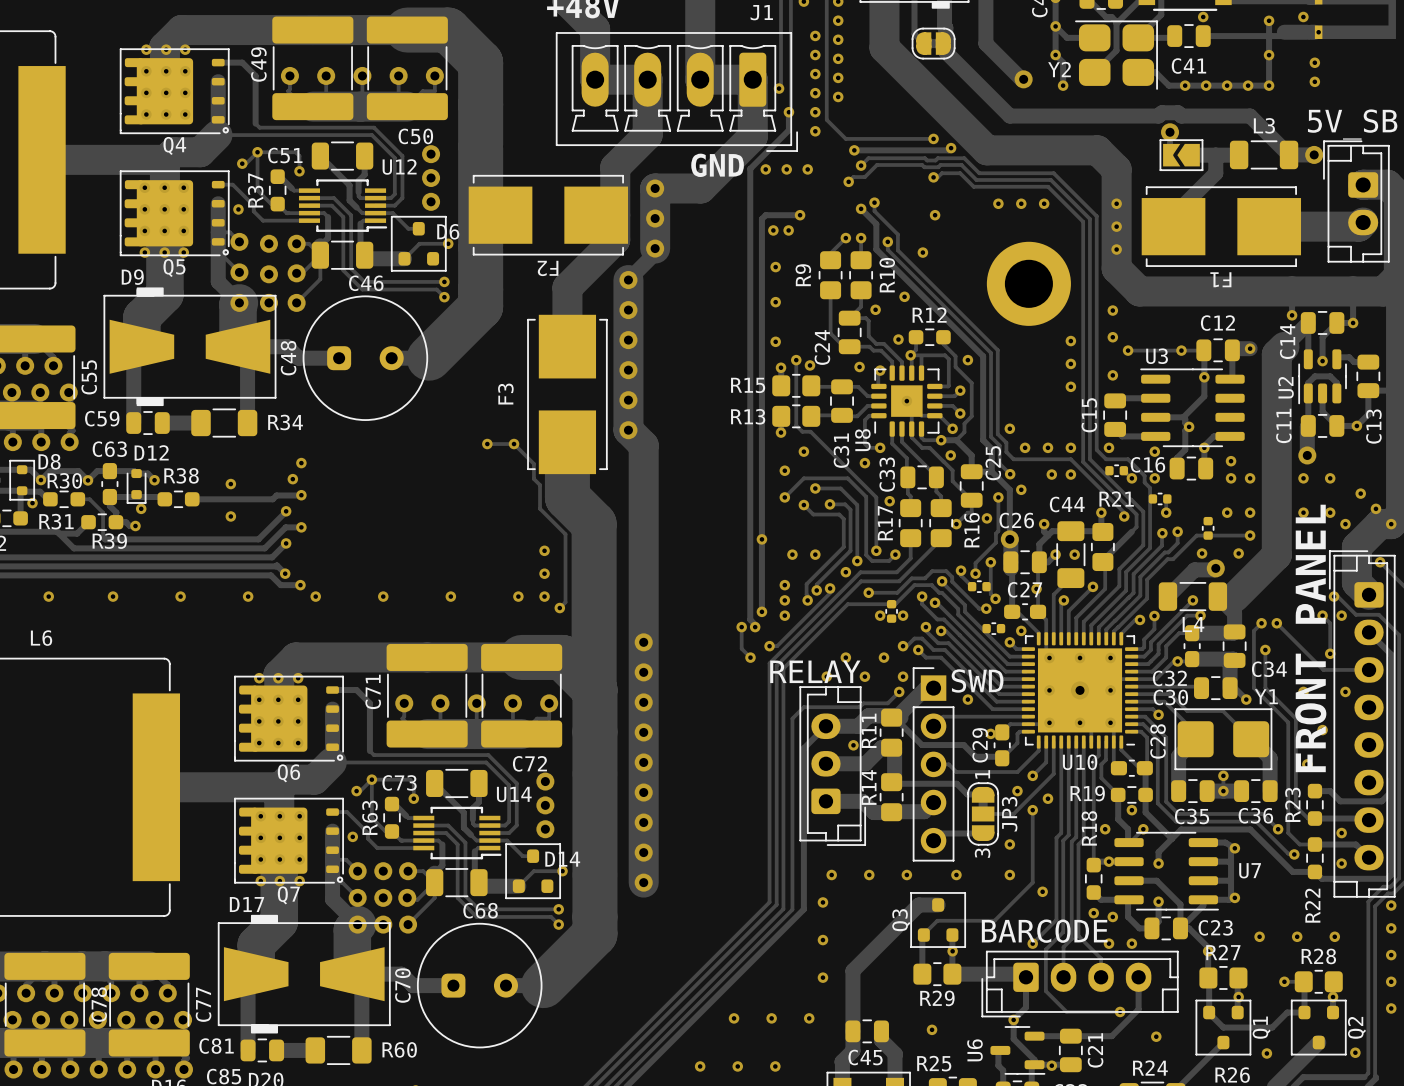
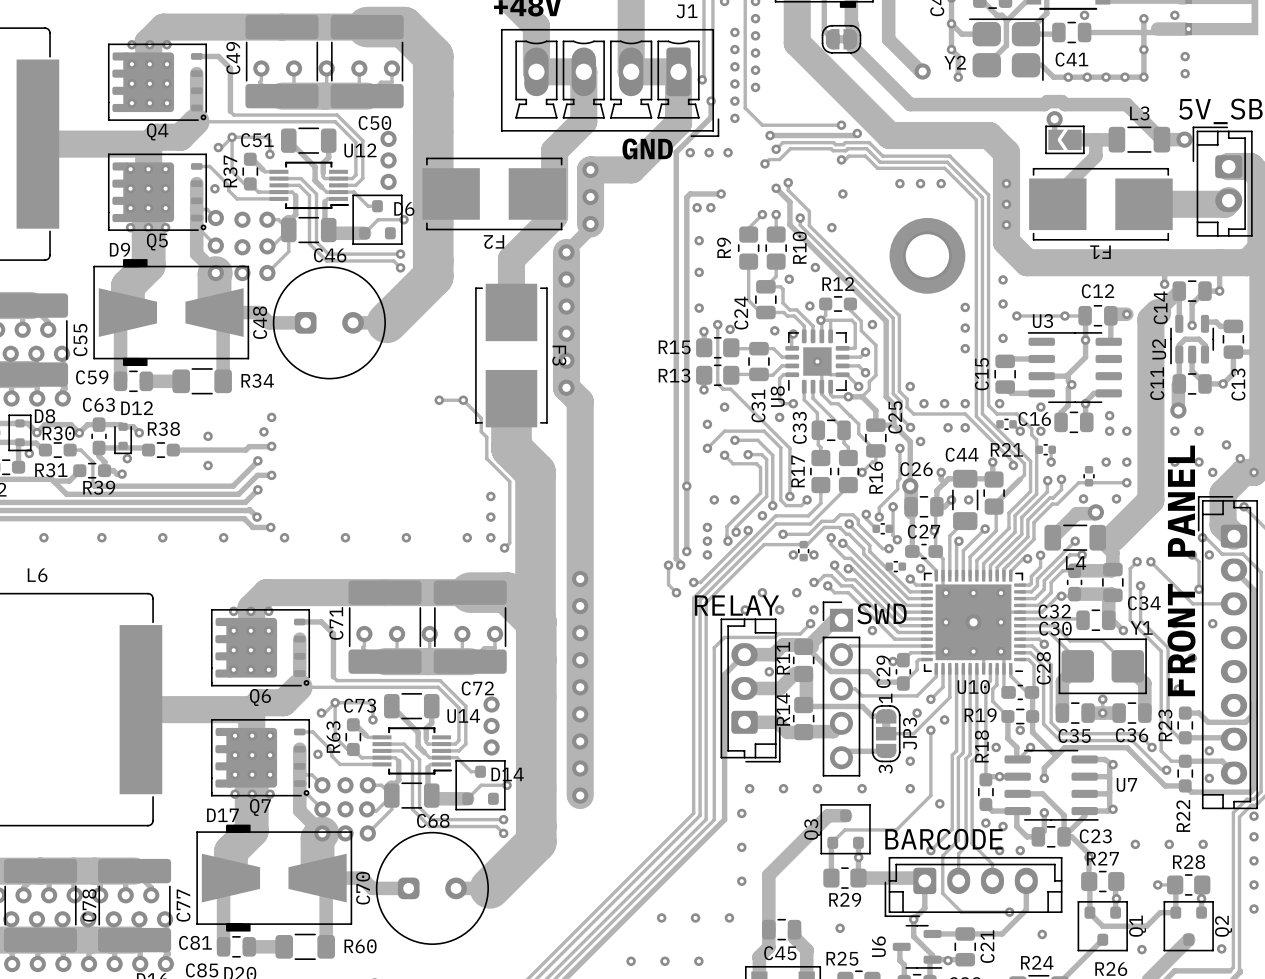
F3 name rotation: 0° (505, 394) -> 180° (559, 355)
F3 name position: F3 (505, 394) -> F3 (559, 355)
via: (950, 455) -> none
via: (889, 501) -> none
via: (986, 518) -> none

